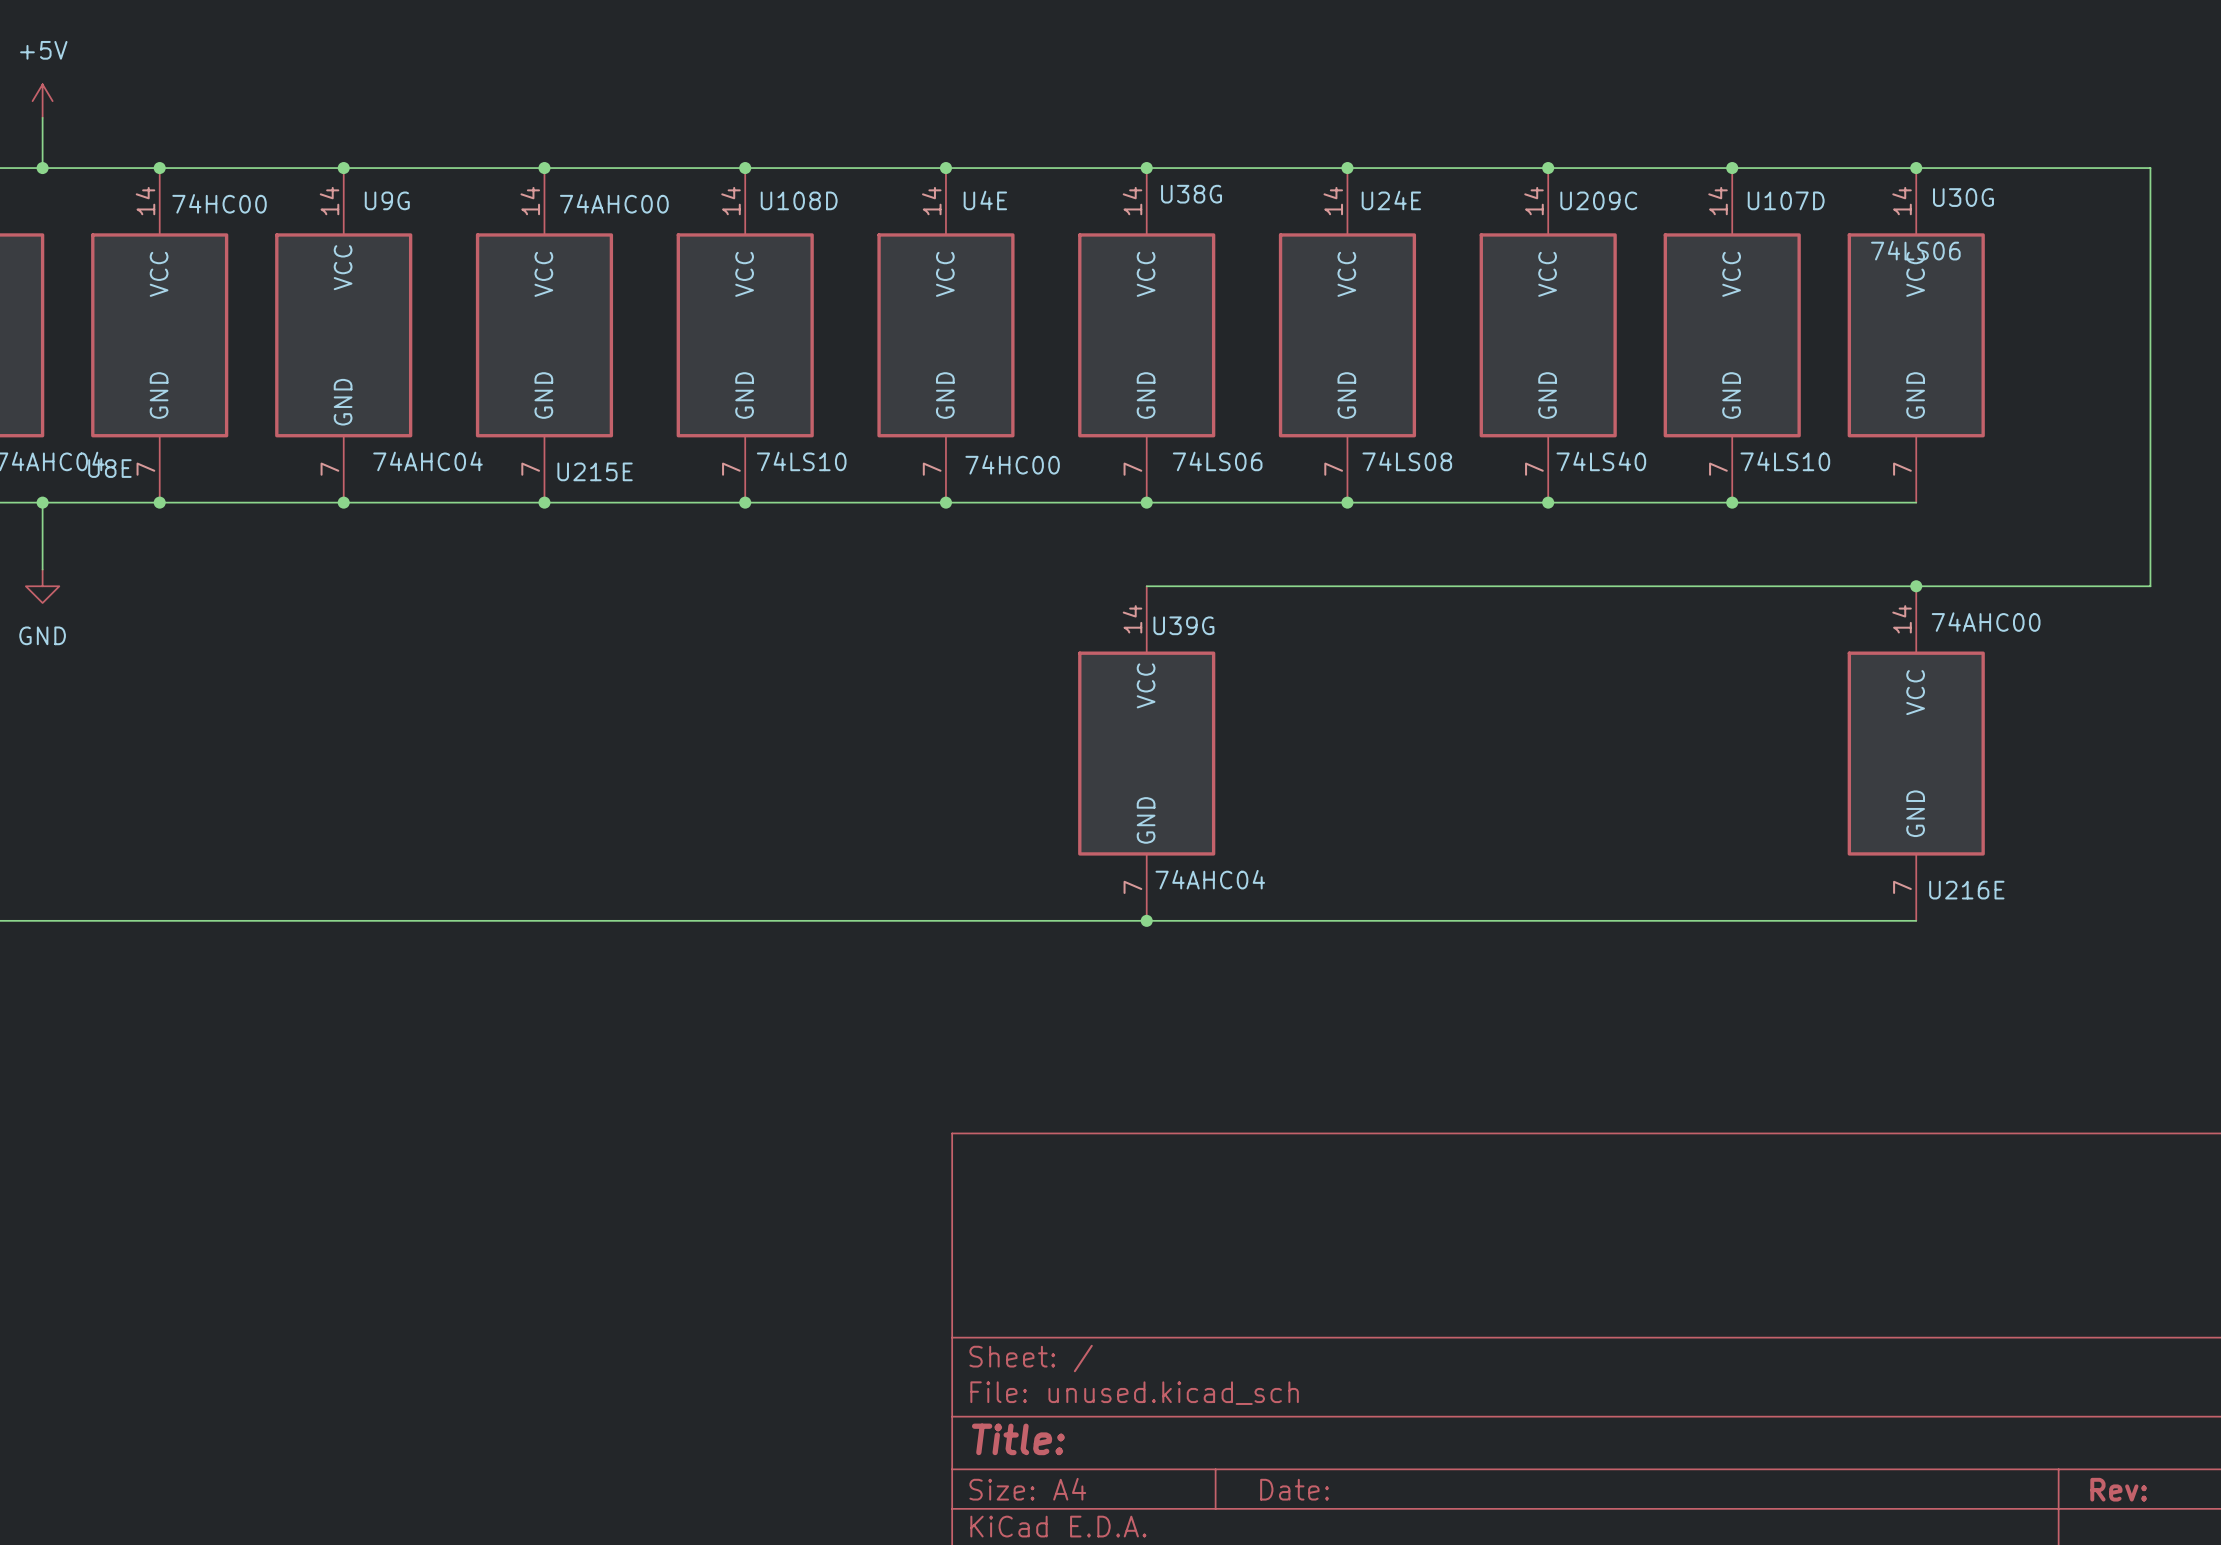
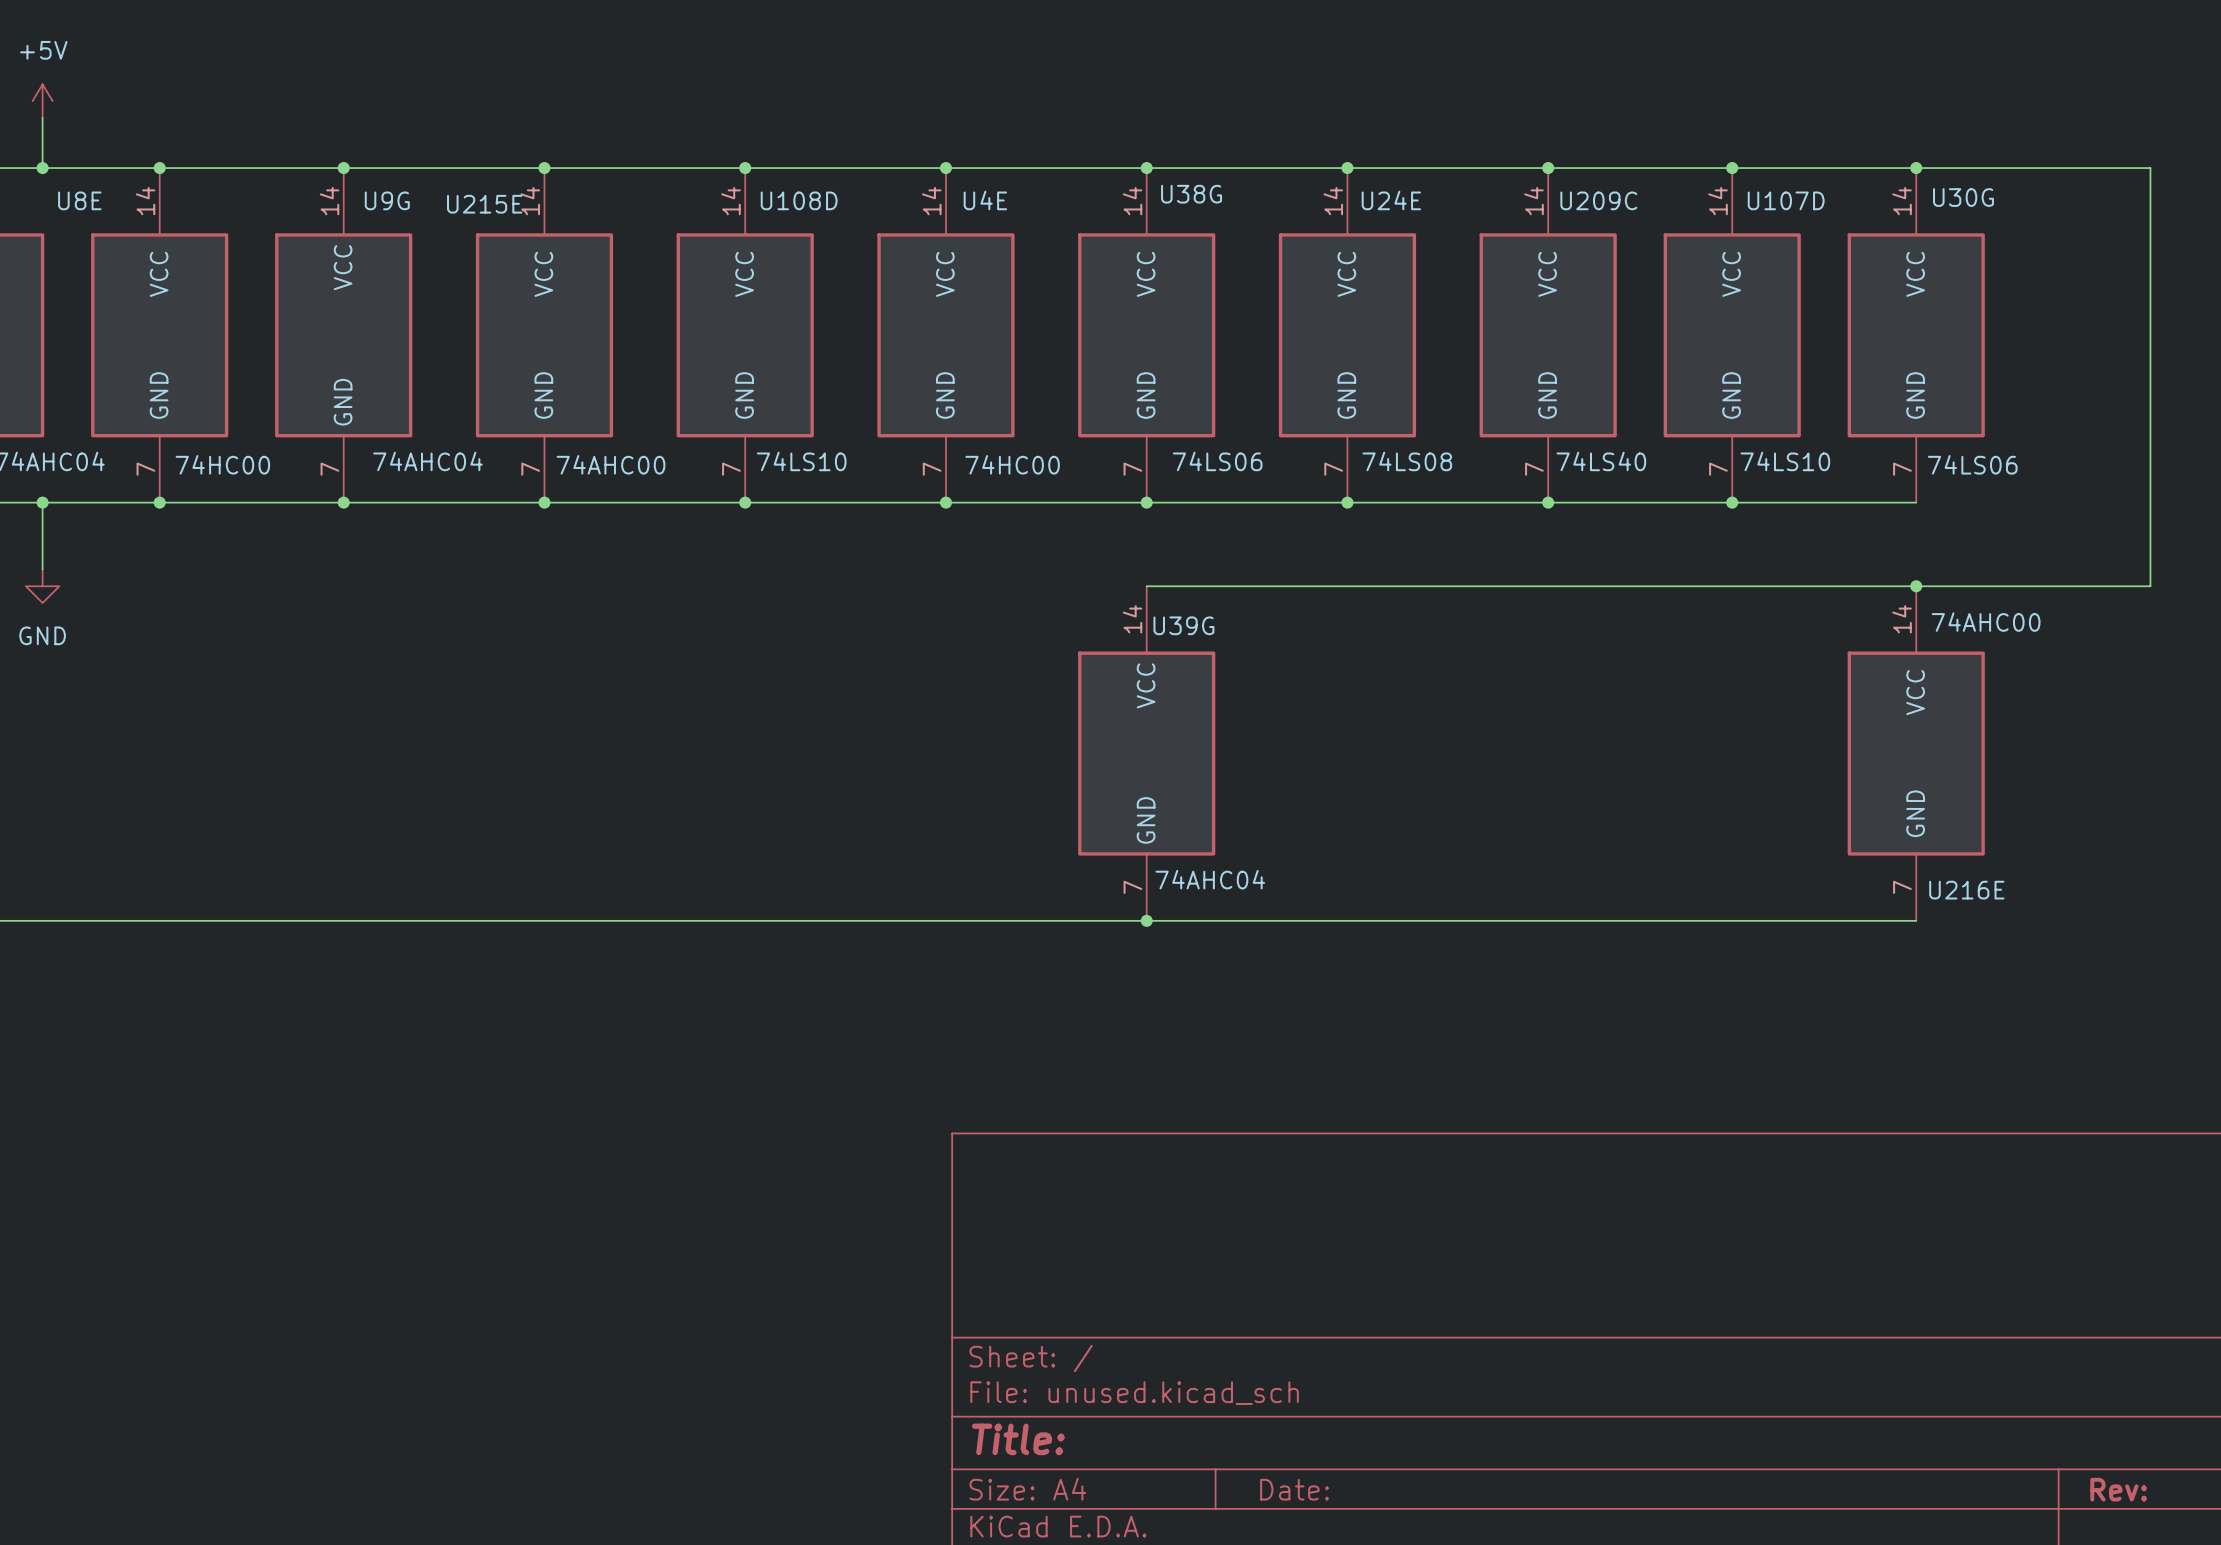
U8E value position: 74HC00 (219, 203) -> 74HC00 (222, 464)
U215E value position: 74AHC00 (614, 203) -> 74AHC00 (610, 464)
U30G value position: 74LS06 (1915, 250) -> 74LS06 (1972, 464)
U8E name position: U8E (109, 468) -> U8E (79, 200)
U215E name position: U215E (595, 471) -> U215E (484, 204)

